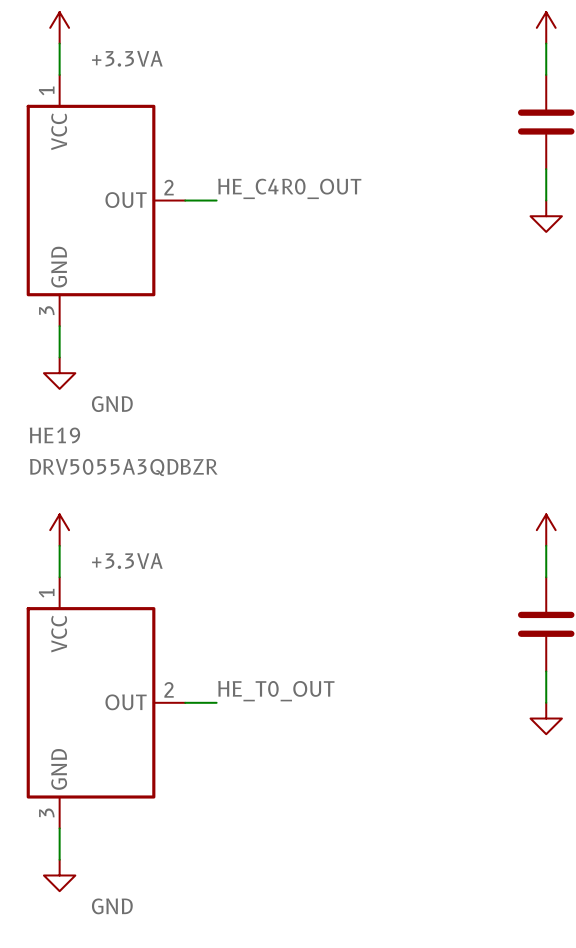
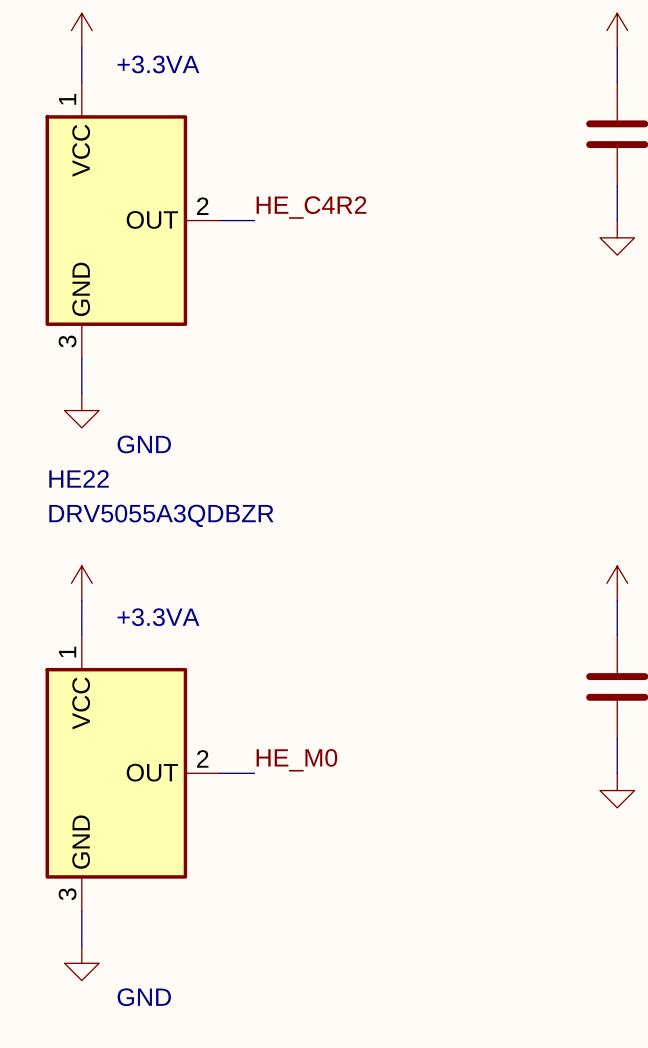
label: HE_C4R0_OUT (289, 188) -> HE_C4R2 (311, 207)
HE19 name: HE19 (54, 435) -> HE22 (79, 478)
label: HE_T0_OUT (276, 691) -> HE_M0 (296, 760)

